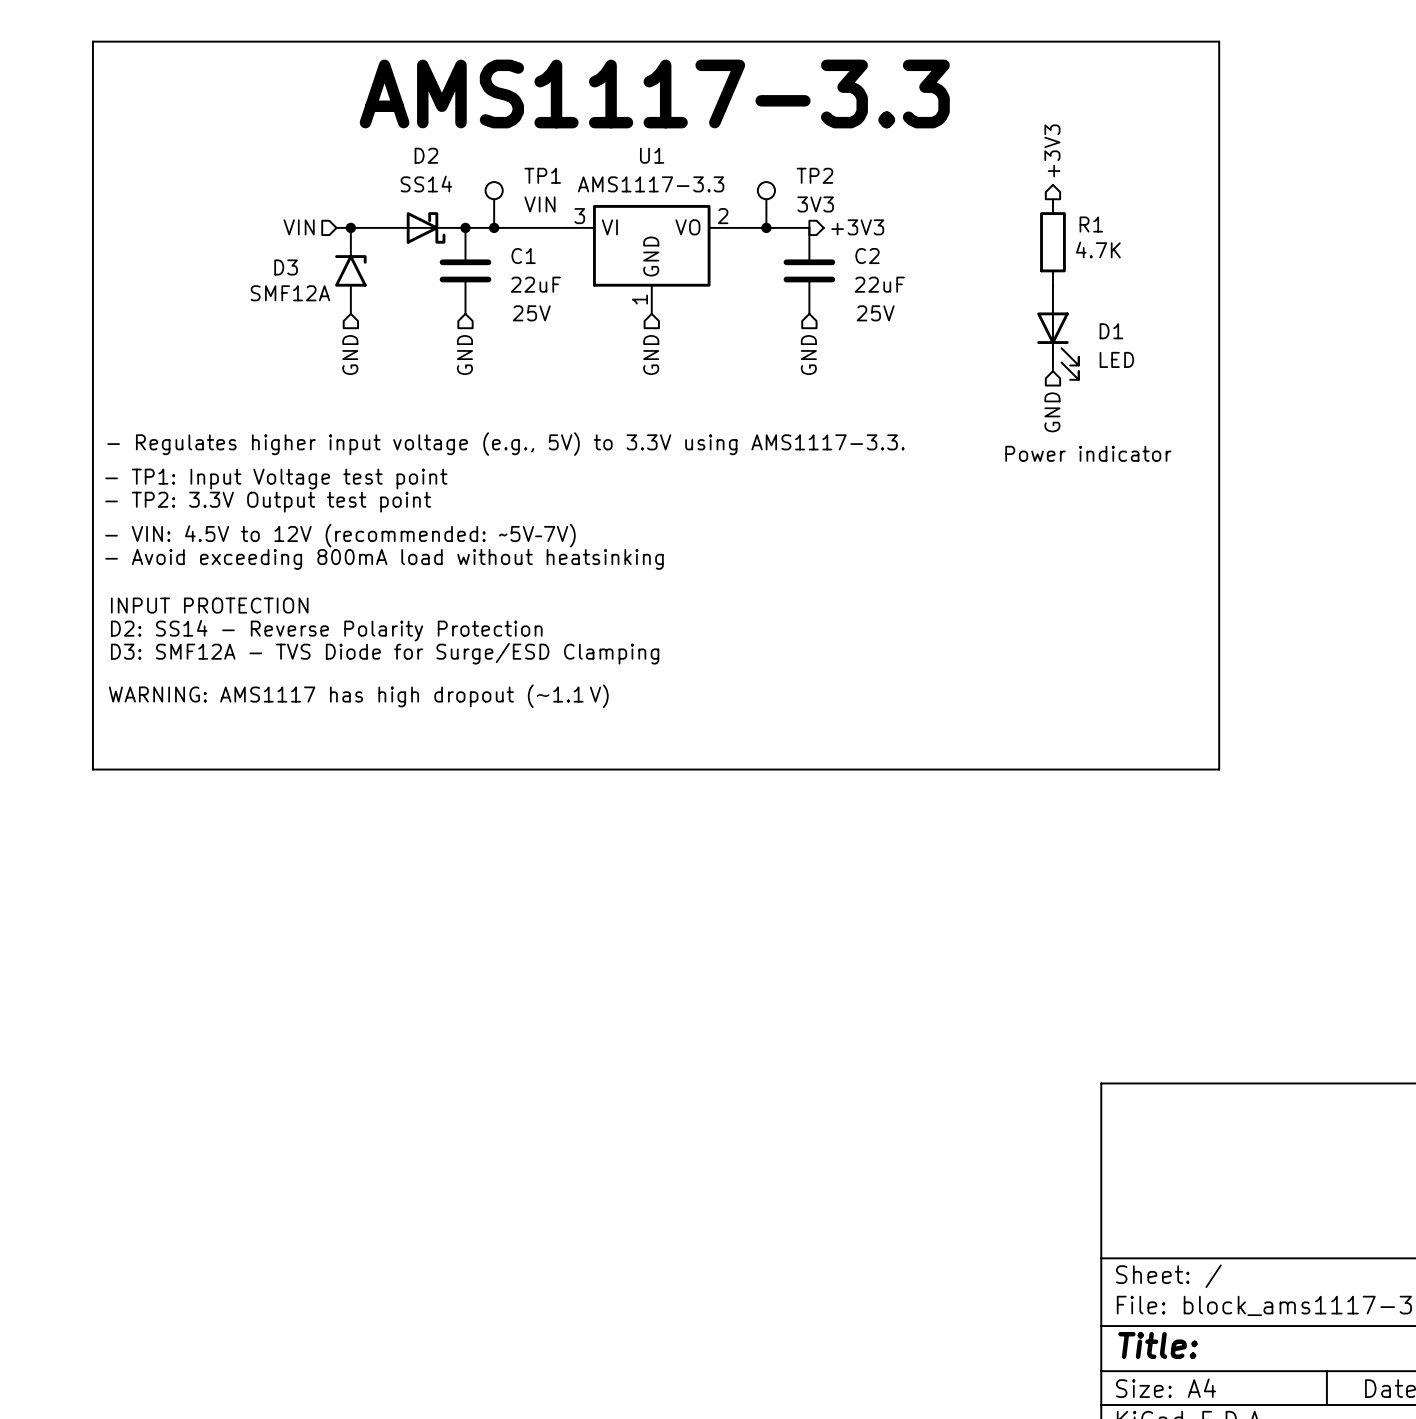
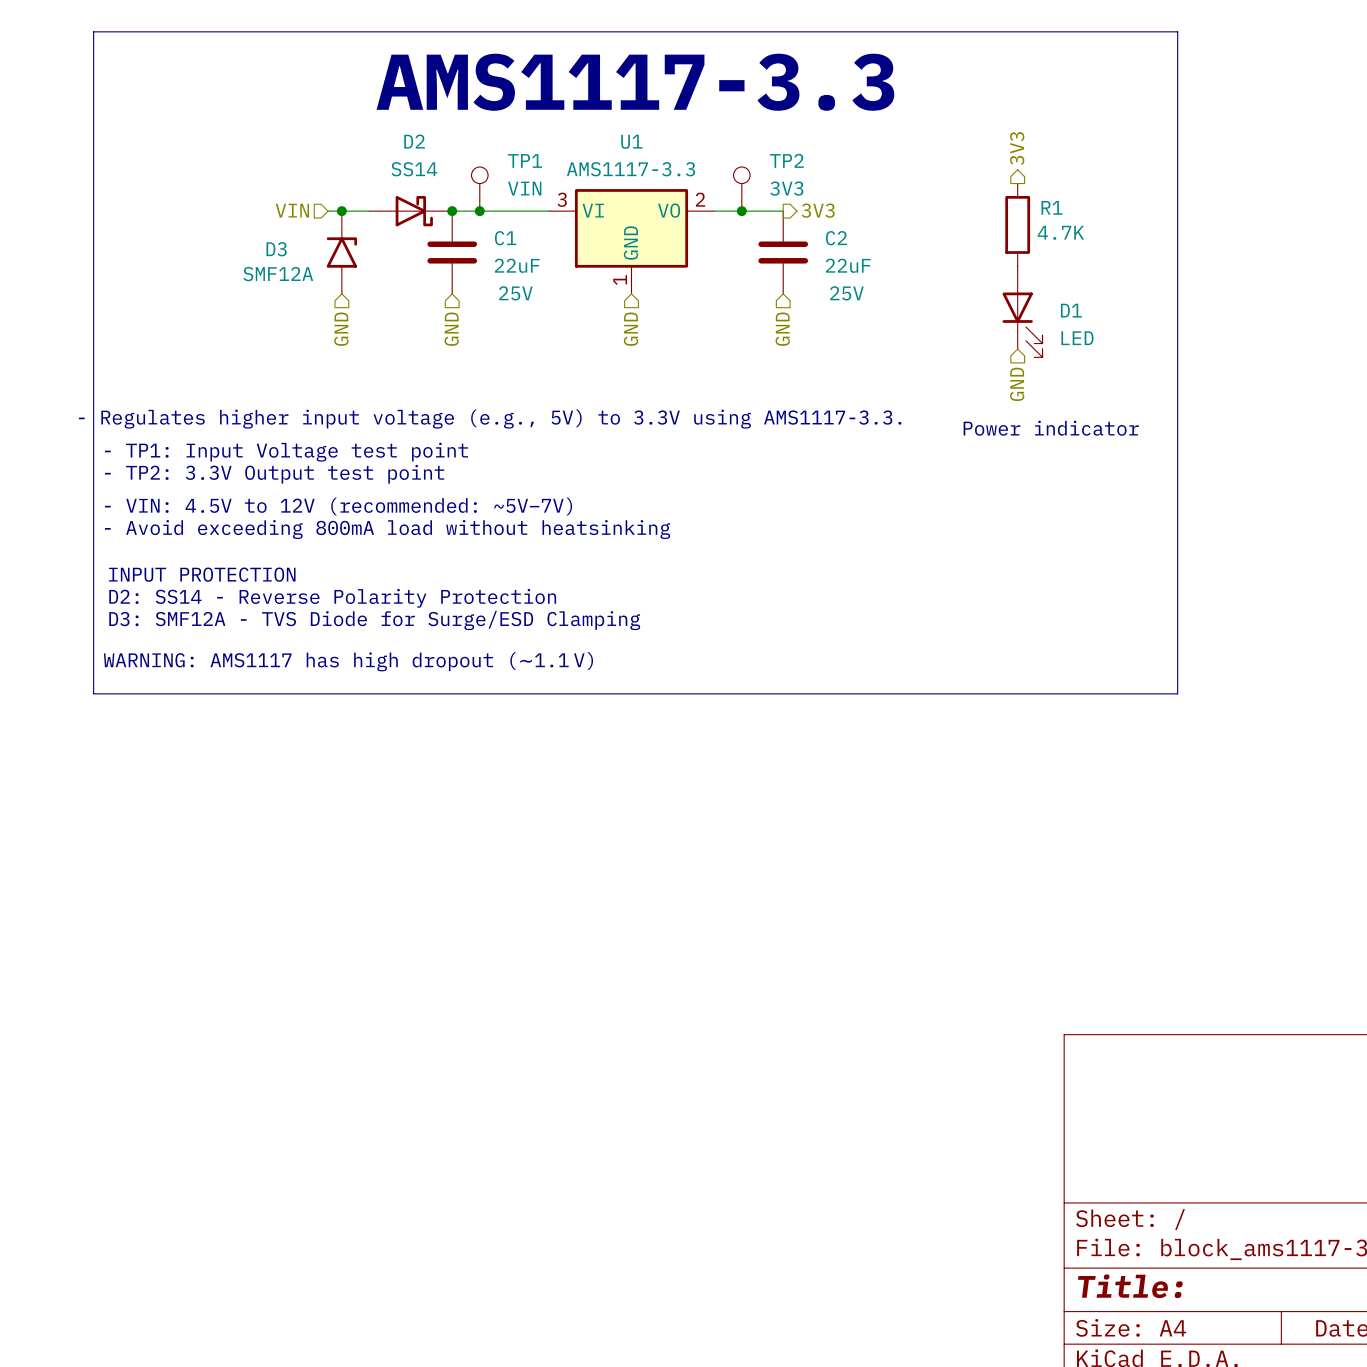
hierarchical label: +3V3 (1052, 150) -> 3V3 (1017, 148)
hierarchical label: +3V3 (857, 227) -> 3V3 (818, 210)
line: (92, 729) (92, 769) (1219, 769) (1219, 729) -> (93, 693) (1177, 693)

